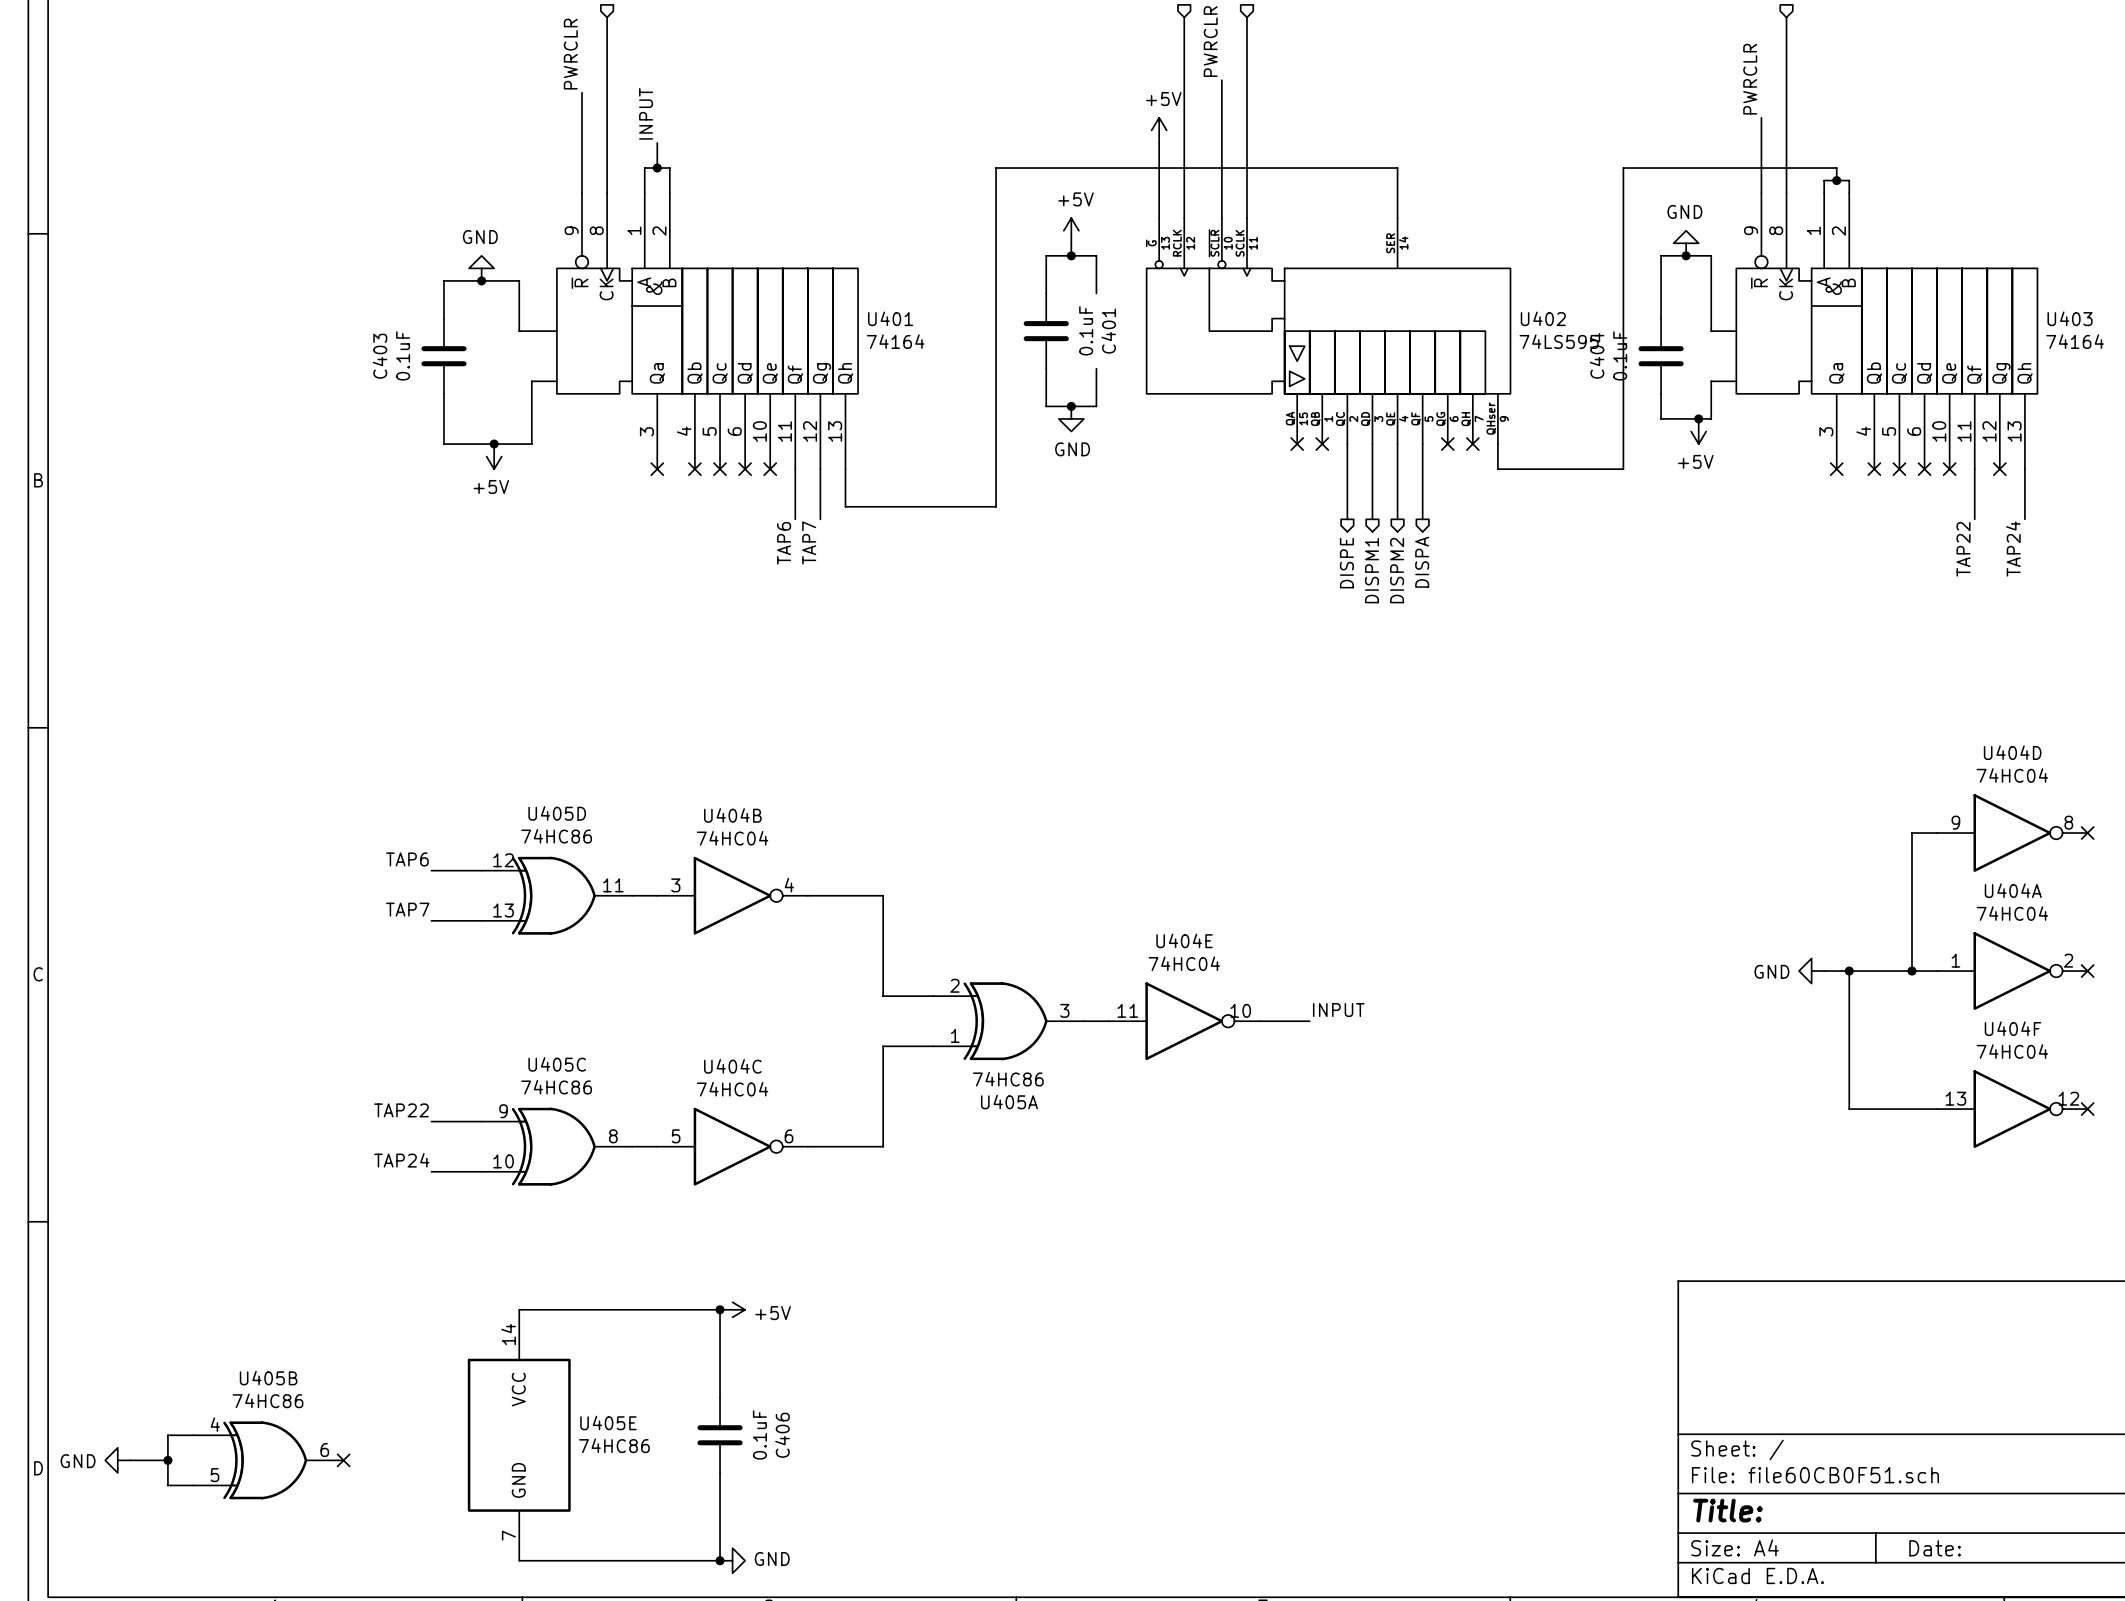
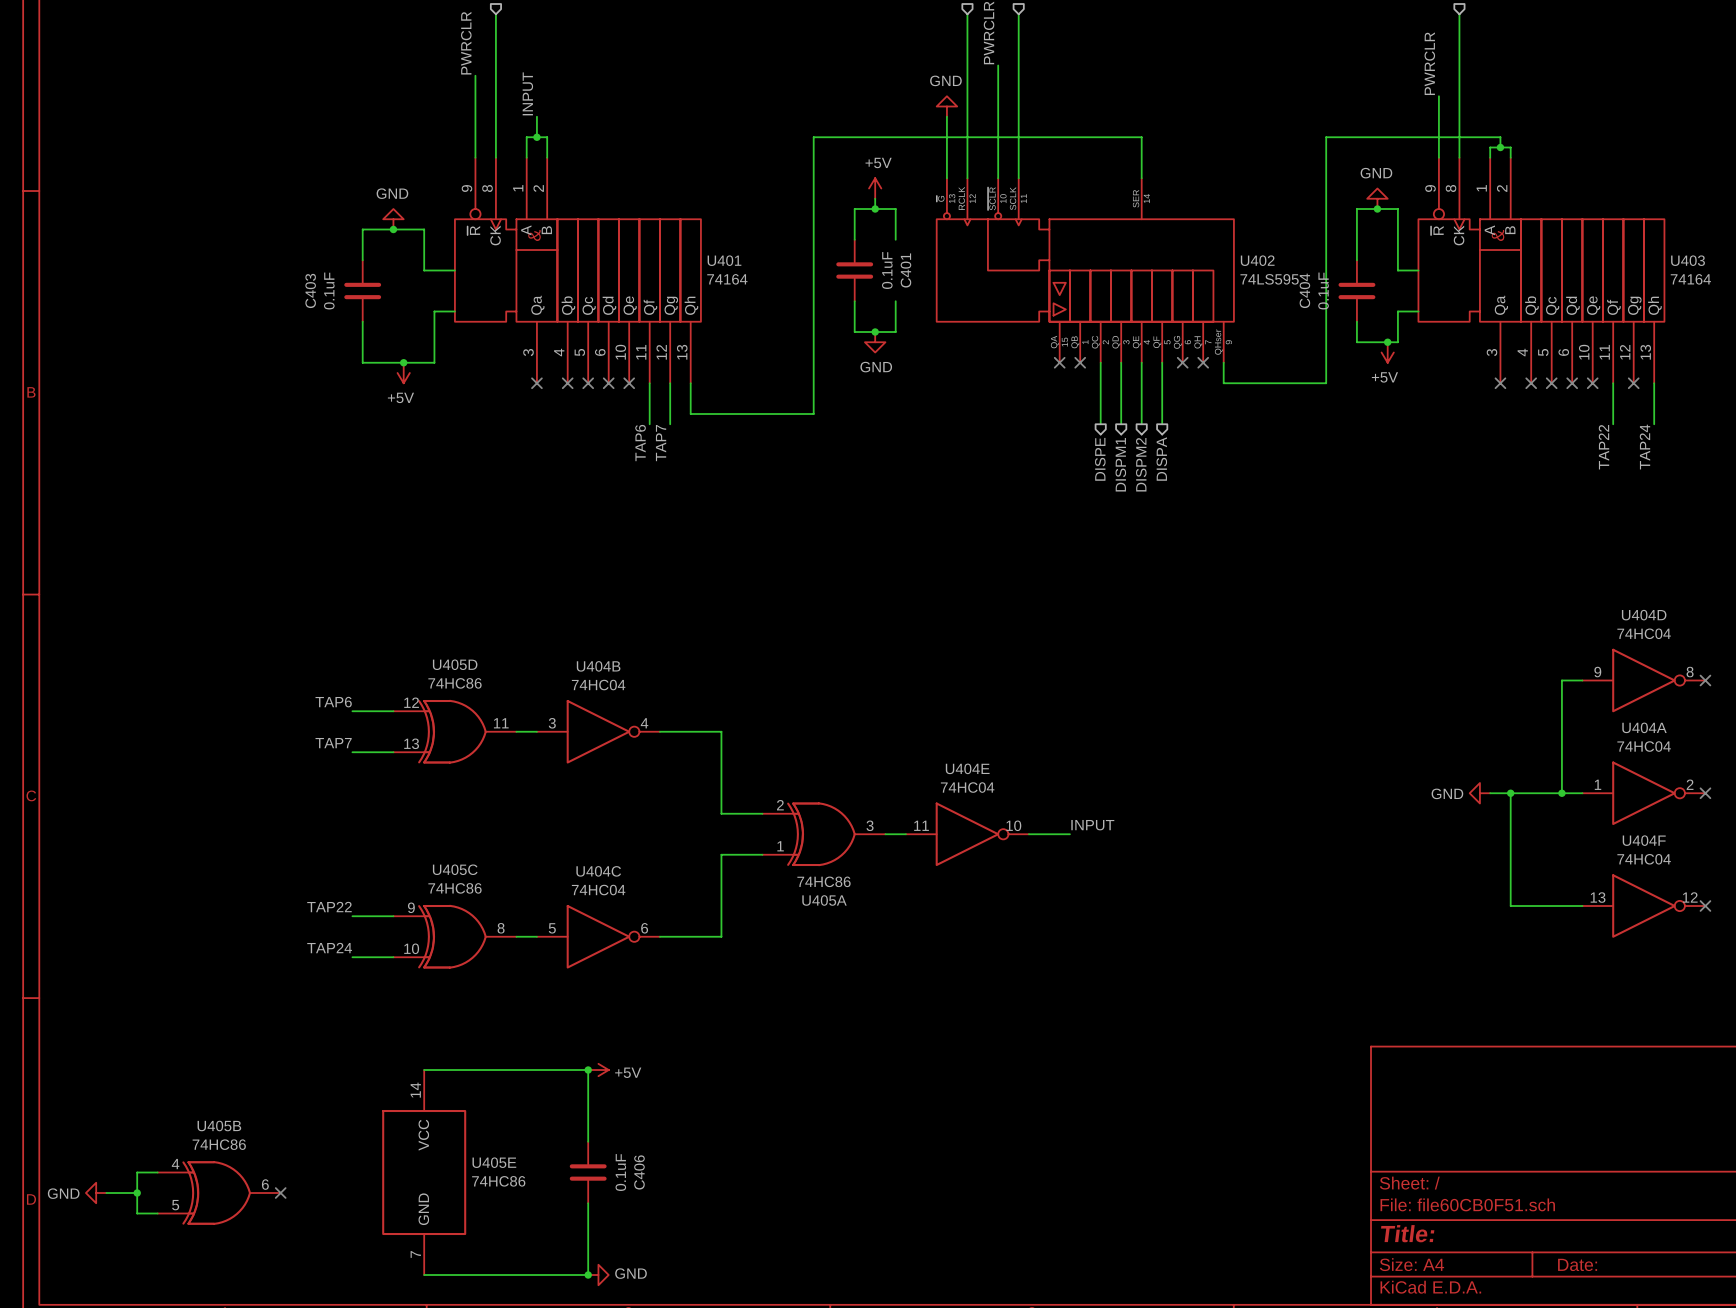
power symbol: +5V (1159, 130) -> GND (946, 106)

